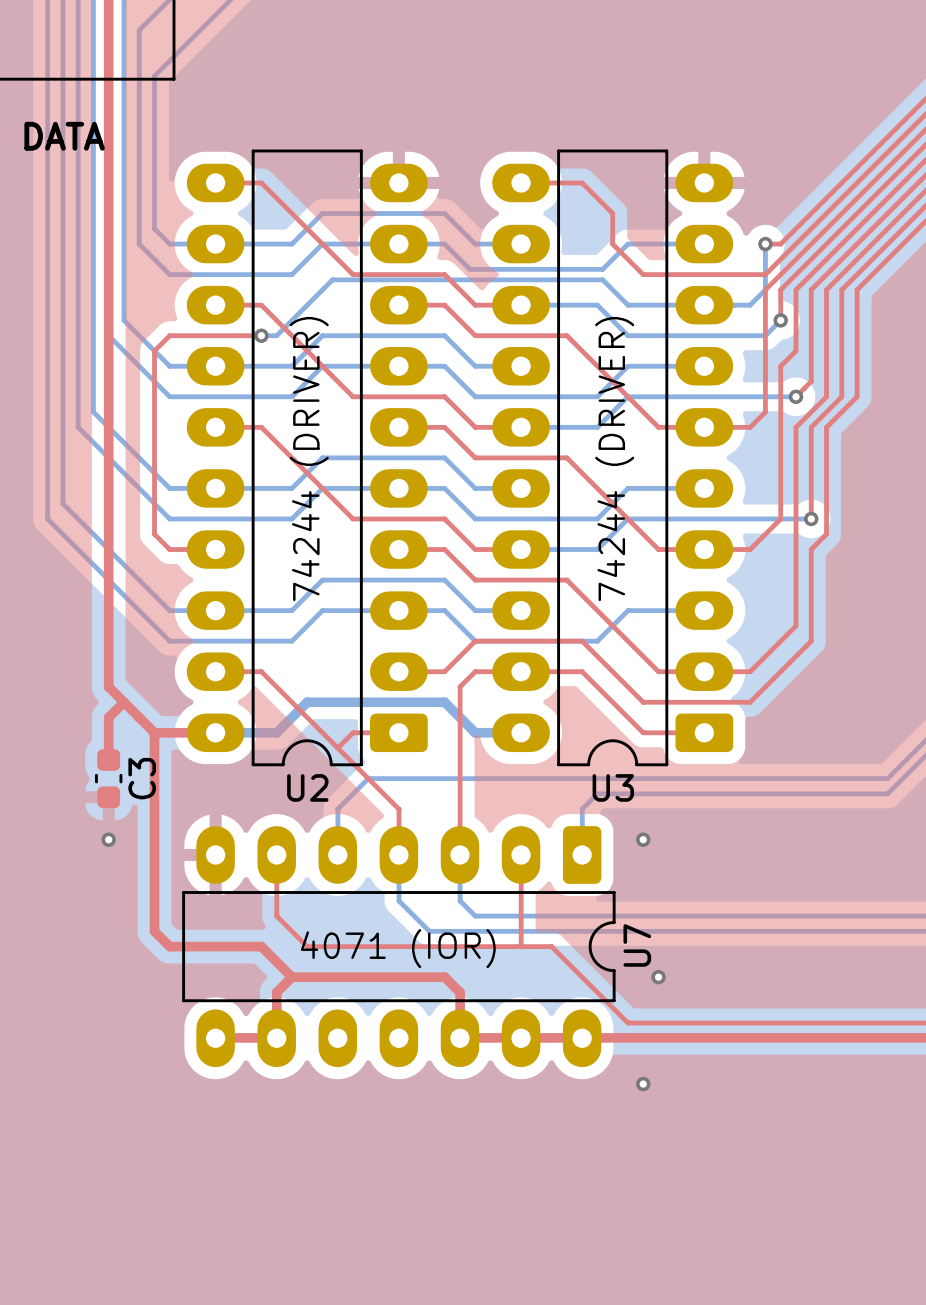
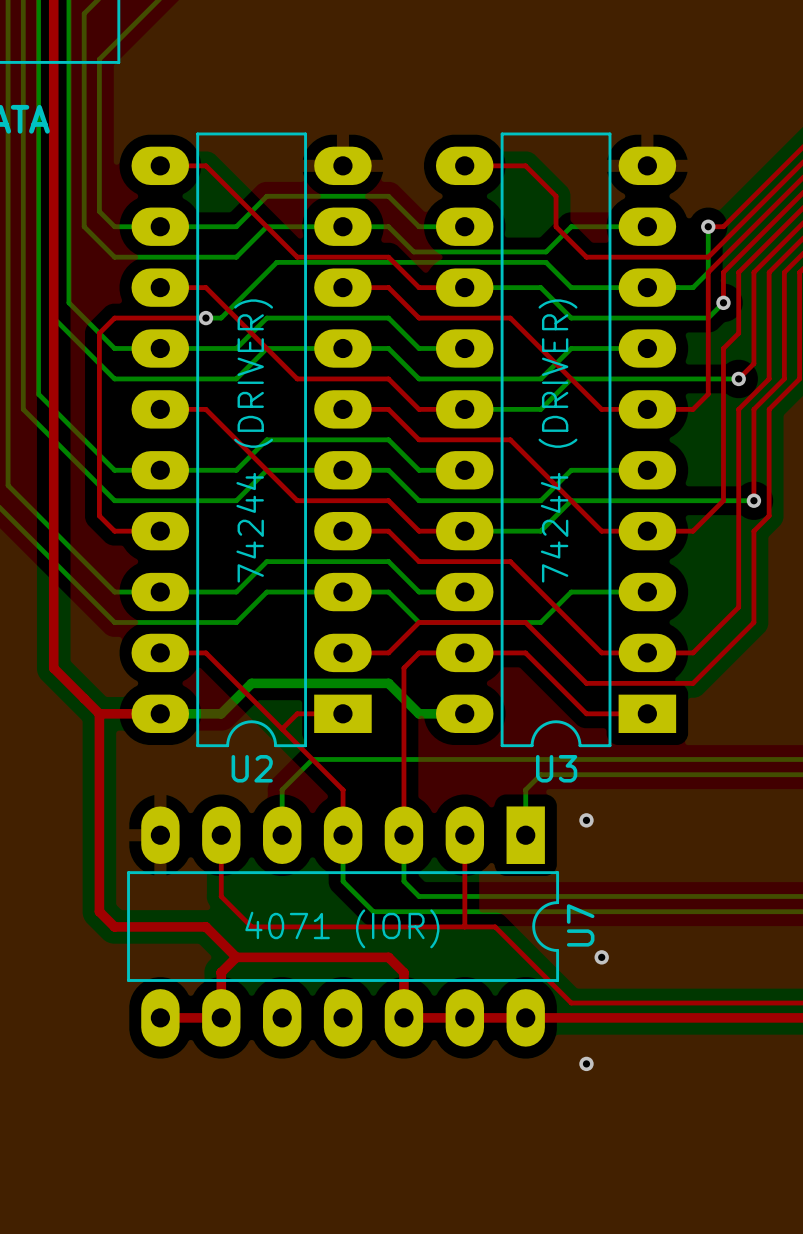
U2 footprint: [186, 149, 428, 767] -> [131, 132, 372, 748]
U3 footprint: [492, 149, 734, 767] -> [435, 132, 677, 748]
top track: (123, 702) (108, 717) (108, 759) -> none
C3: (108, 778) -> none
U7 footprint: [182, 826, 616, 1068] -> [127, 806, 560, 1047]
via: (108, 839) -> none

